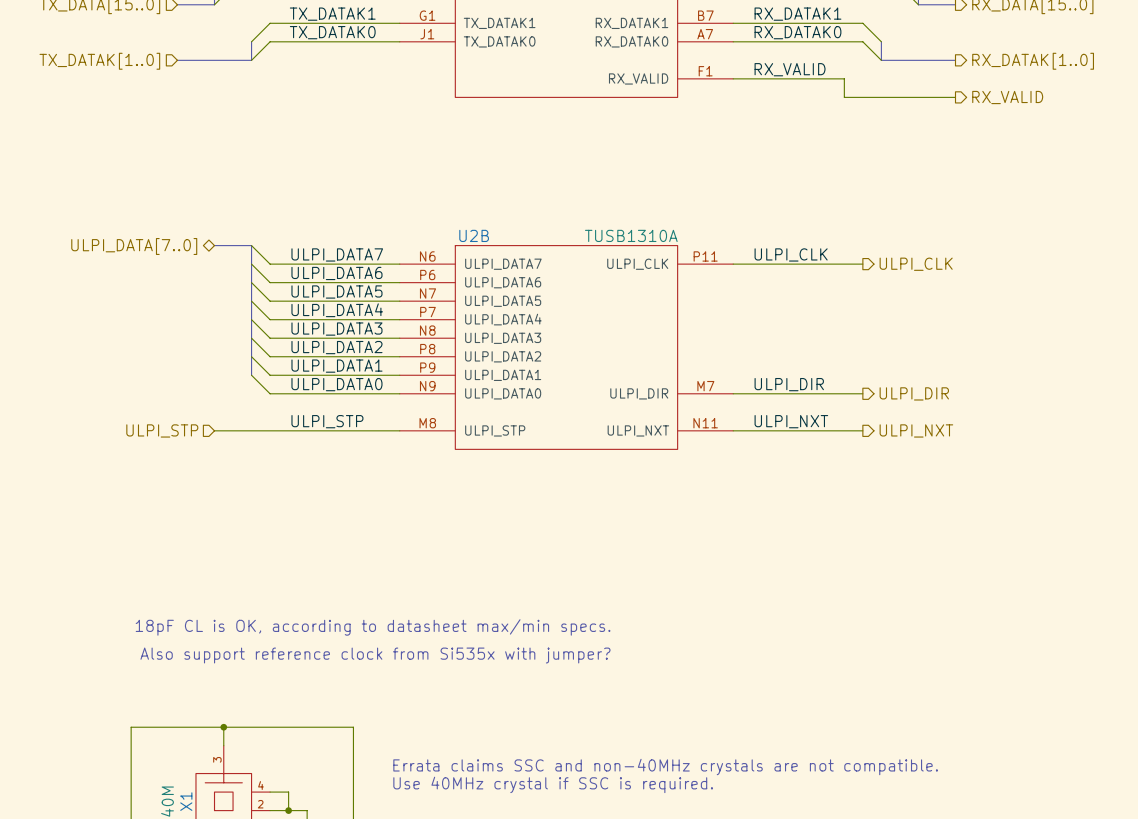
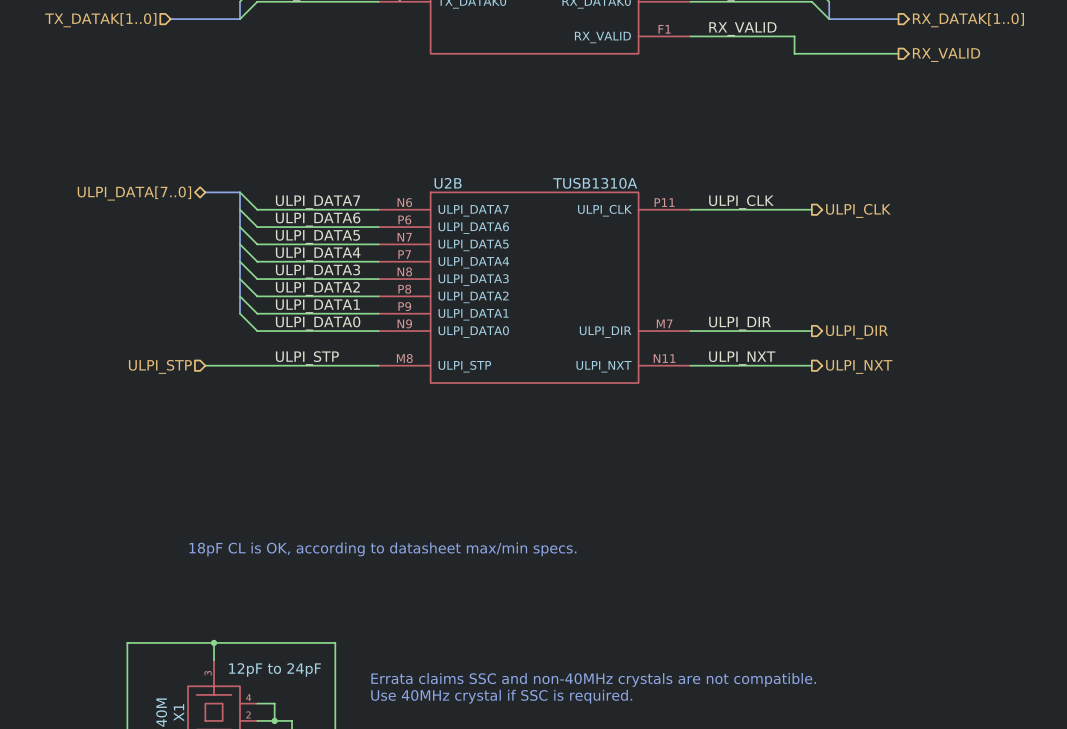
text: Also support reference clock from Si535x with jumper? (375, 655) -> none
X1 text: none -> 12pF to 24pF (275, 669)

